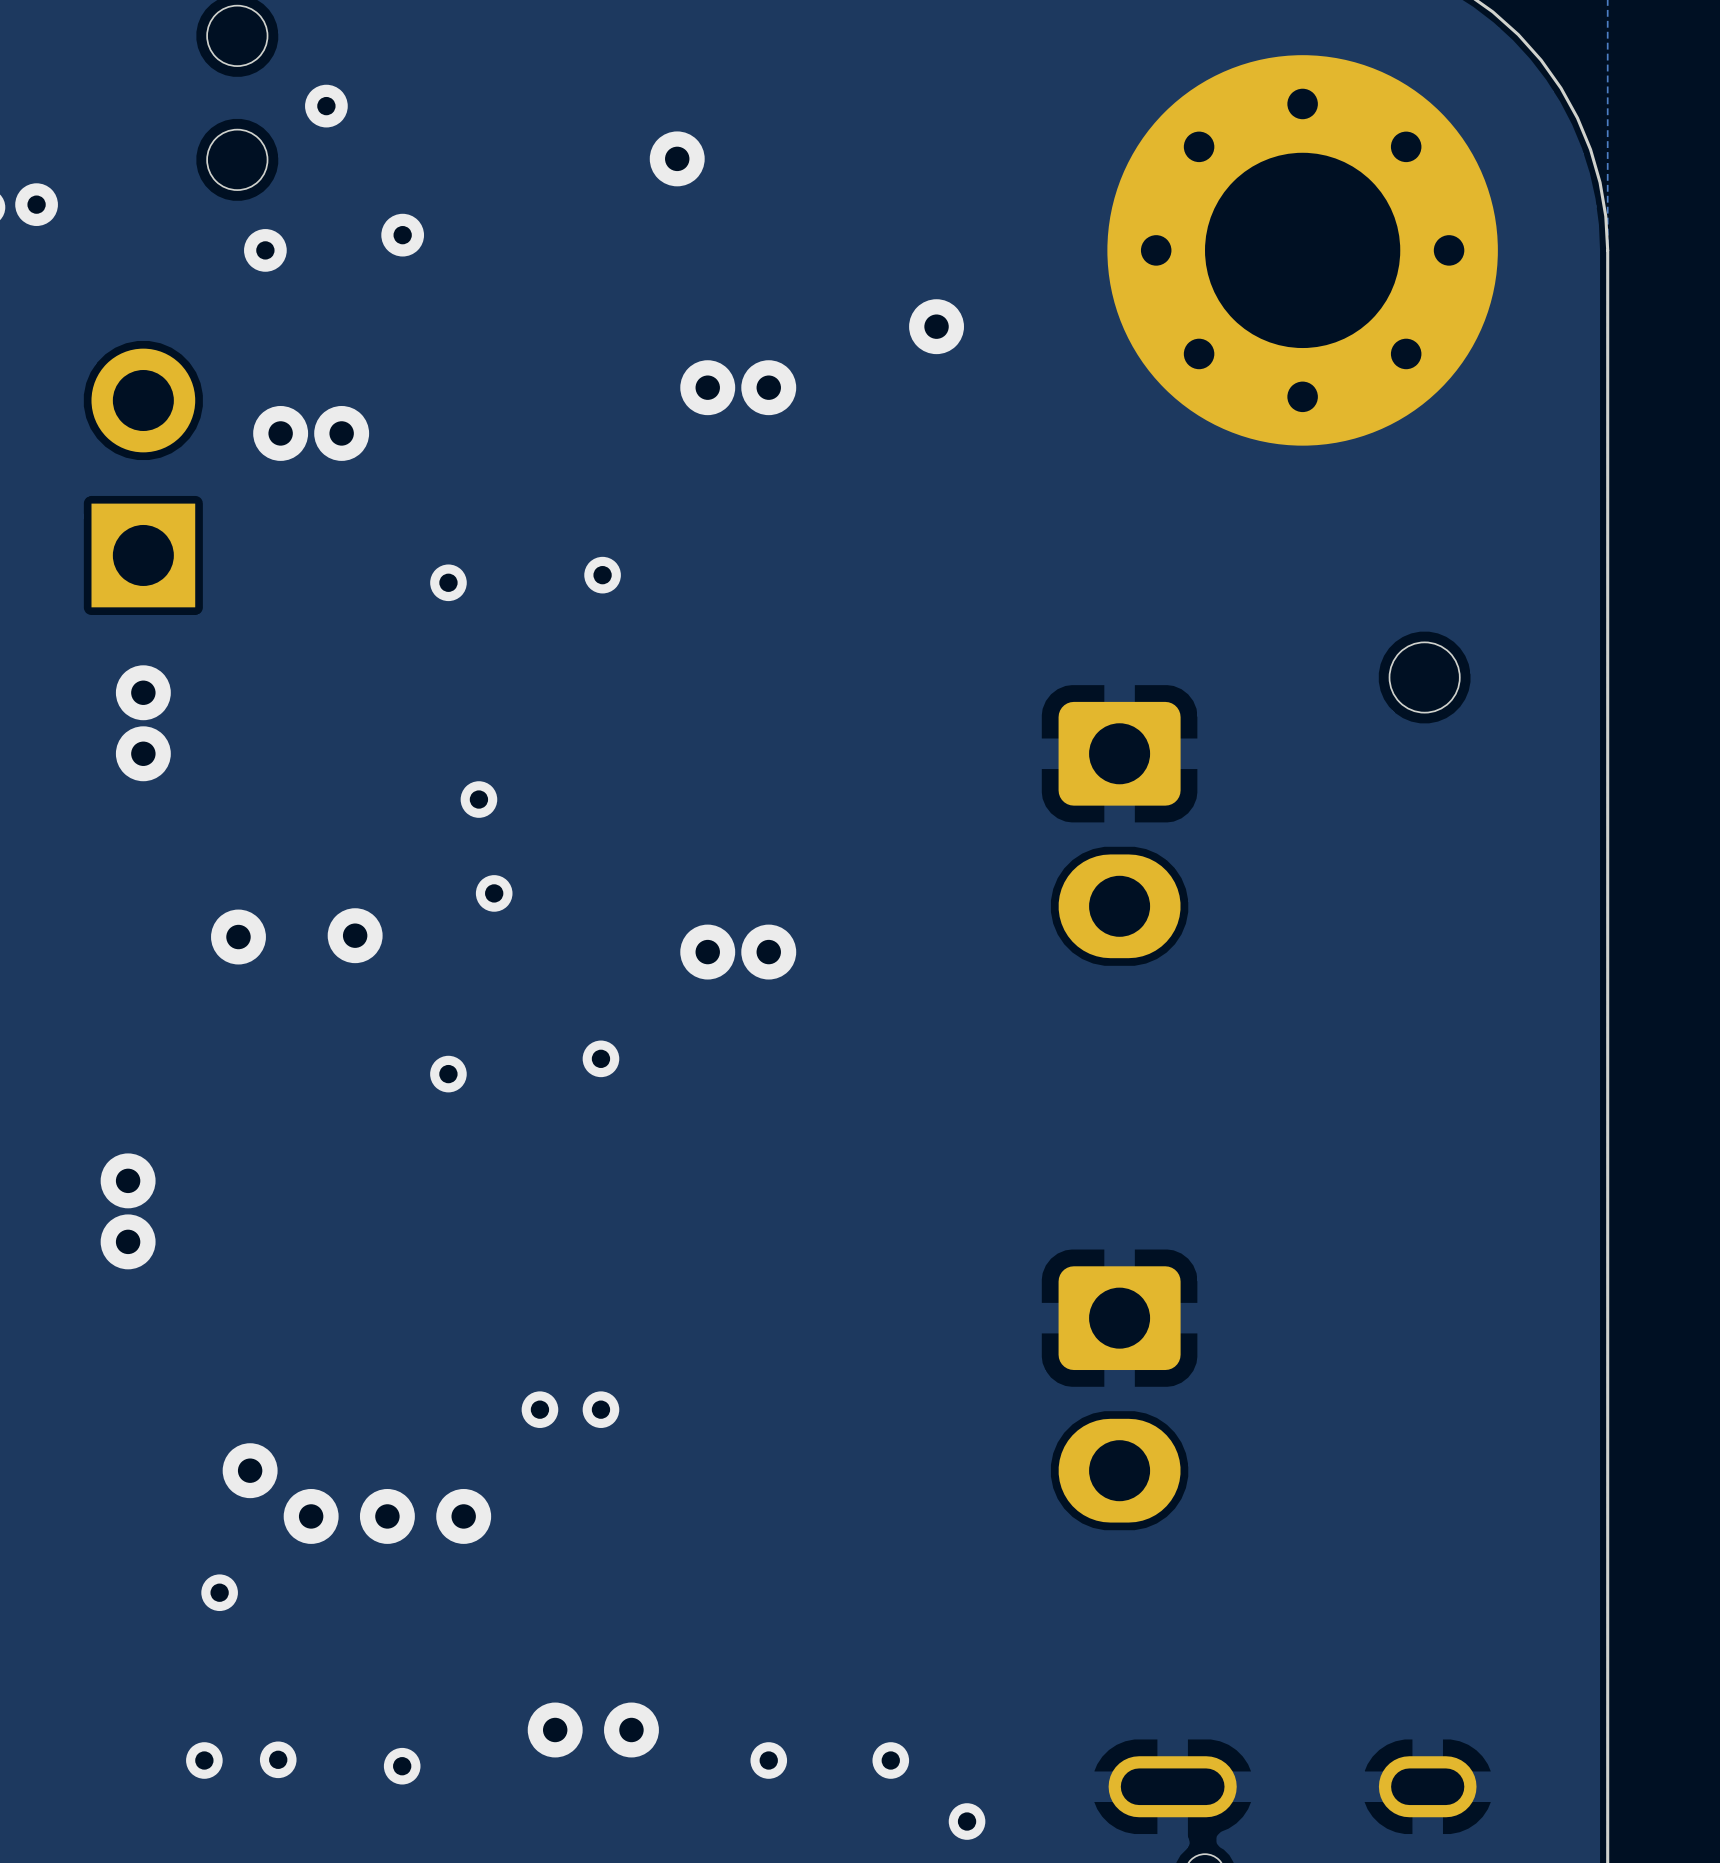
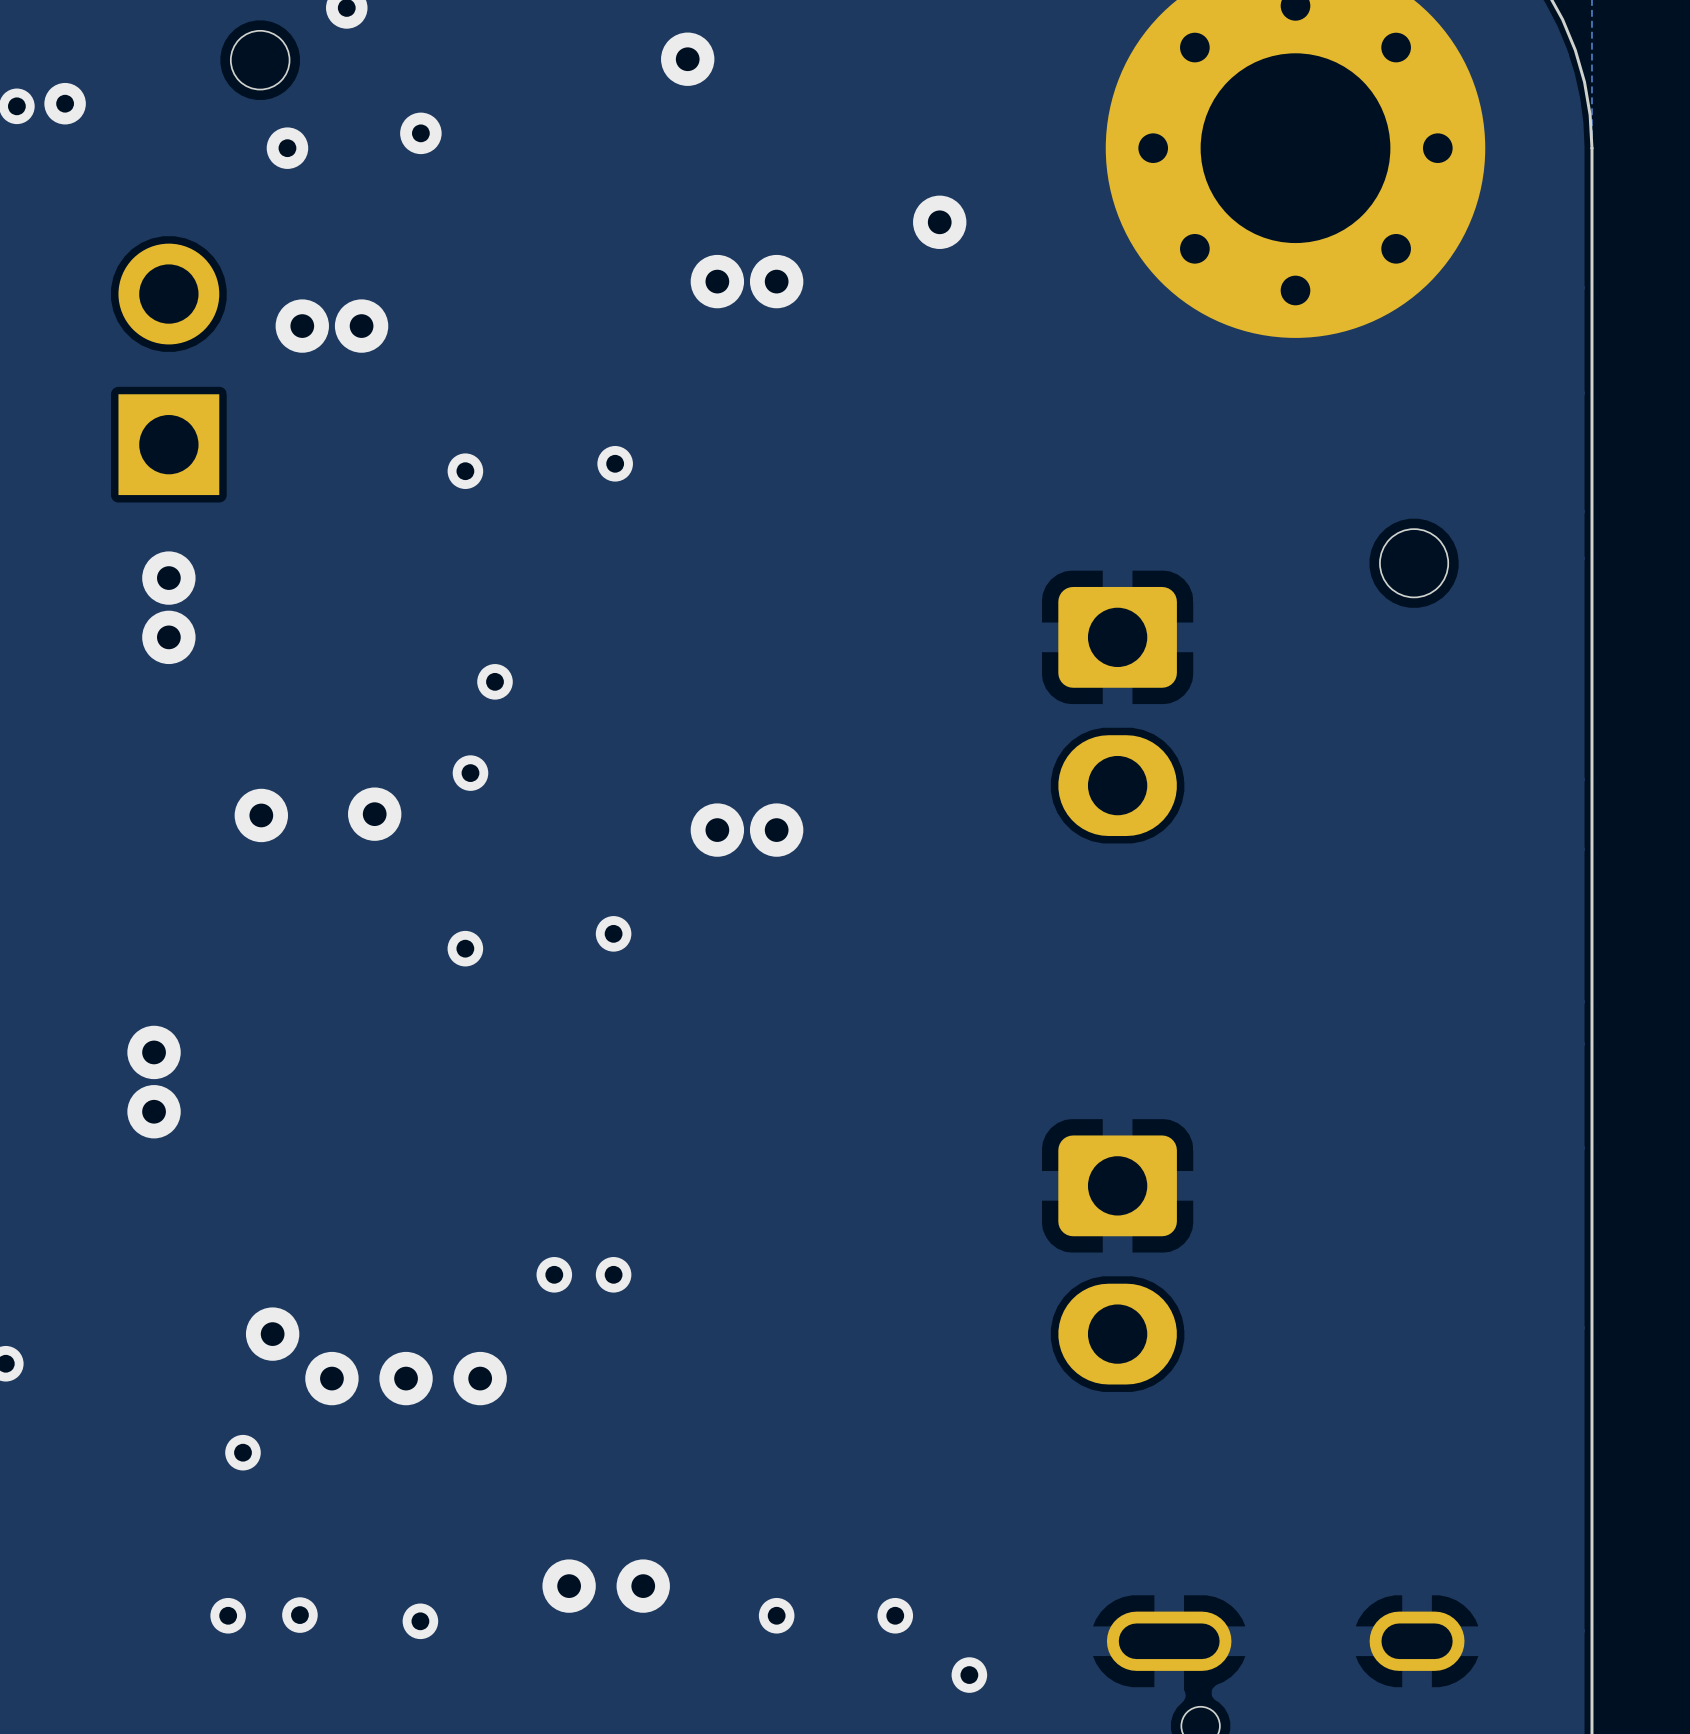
via position: (494, 893) -> (470, 773)

